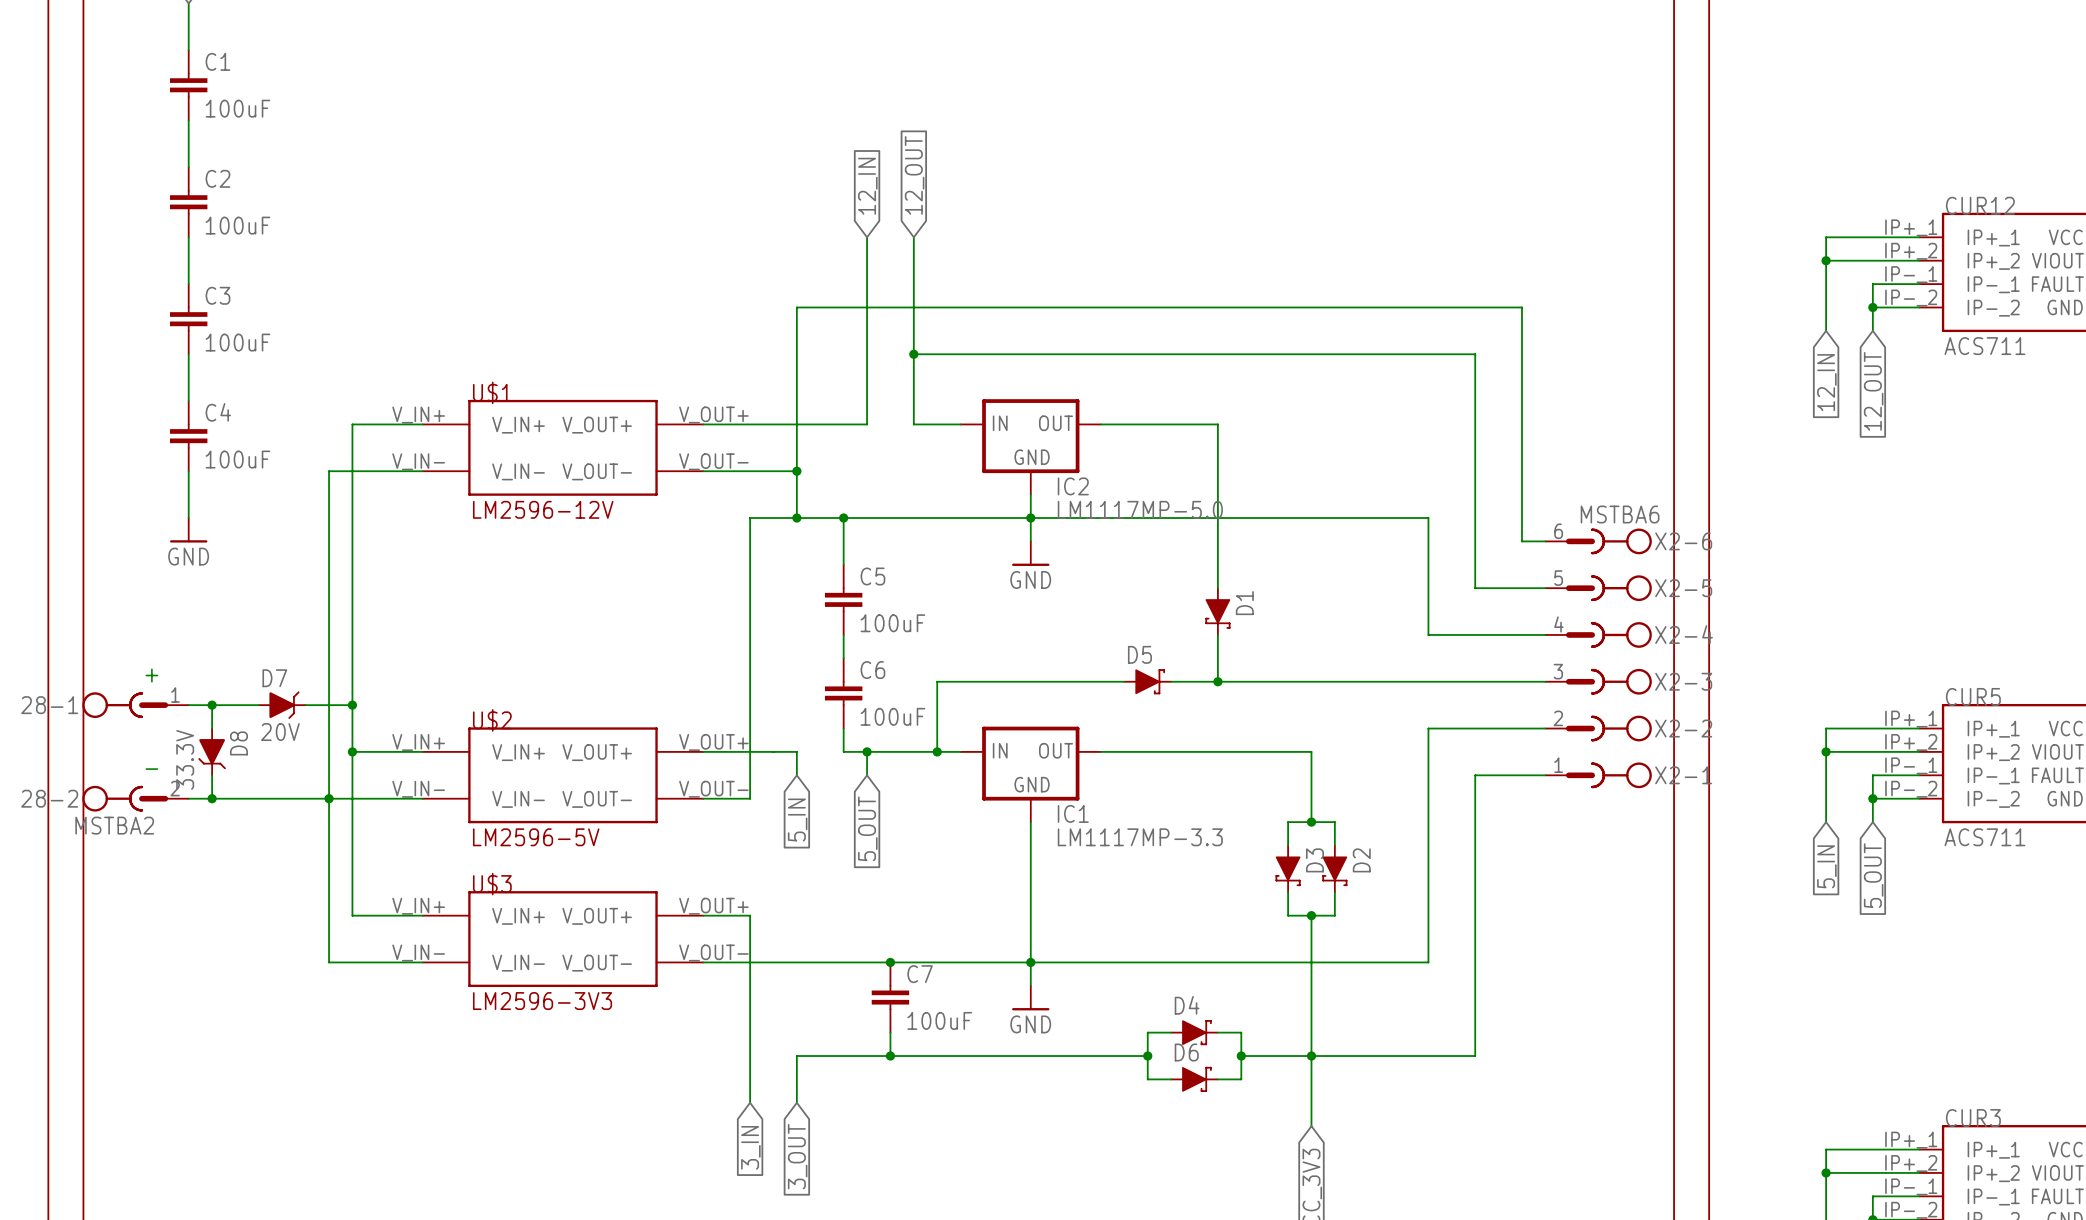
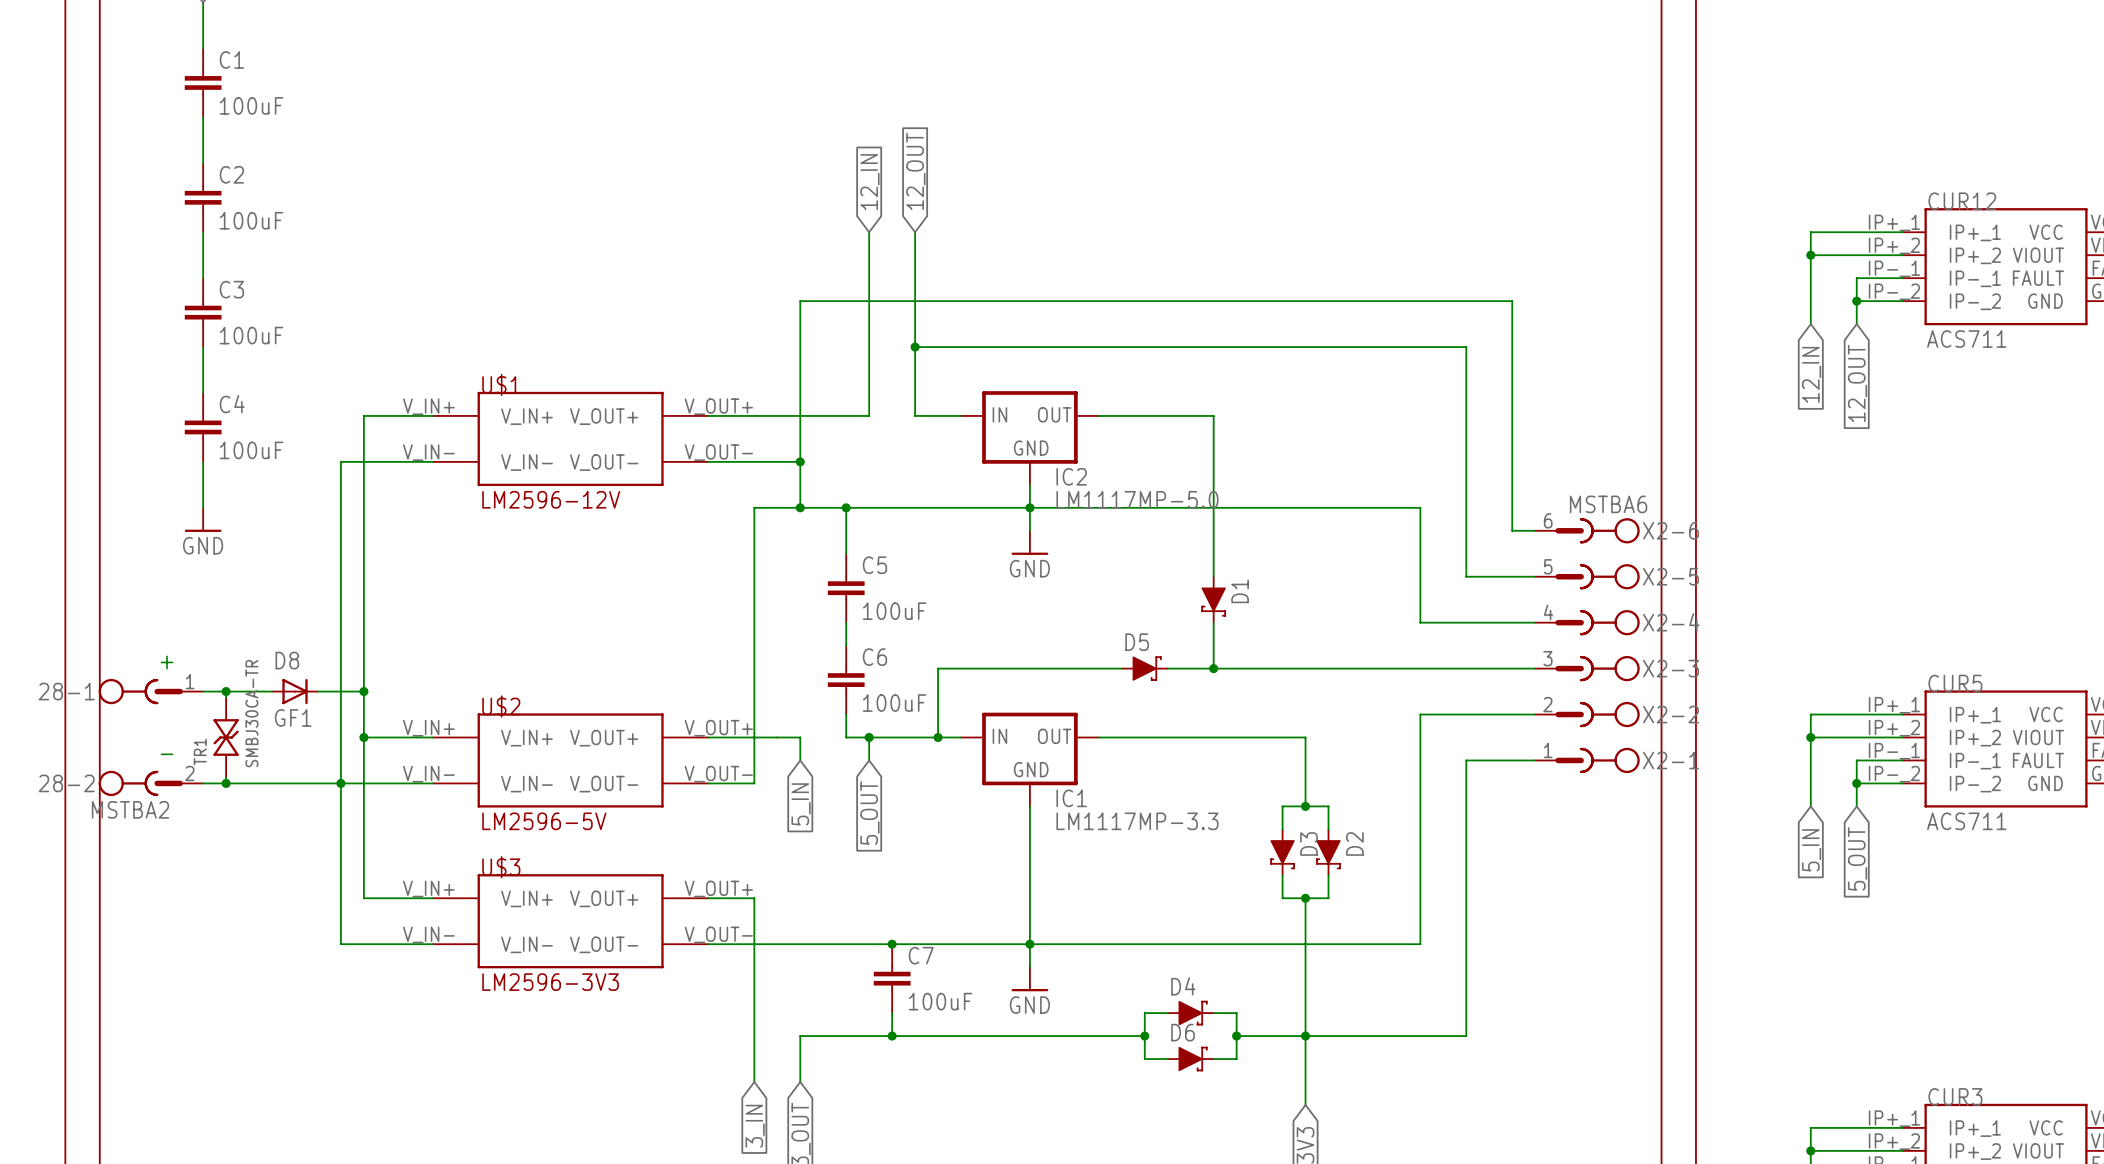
D7: 20V (282, 705) -> none
D8 symbol: [198, 727, 226, 777] -> [272, 678, 318, 705]
D8 name position: D8 (238, 743) -> D8 (287, 660)
TR1: none -> SMBJ30CA-TR (226, 737)
D8 value: 33.3V (185, 759) -> GF1 (293, 717)

